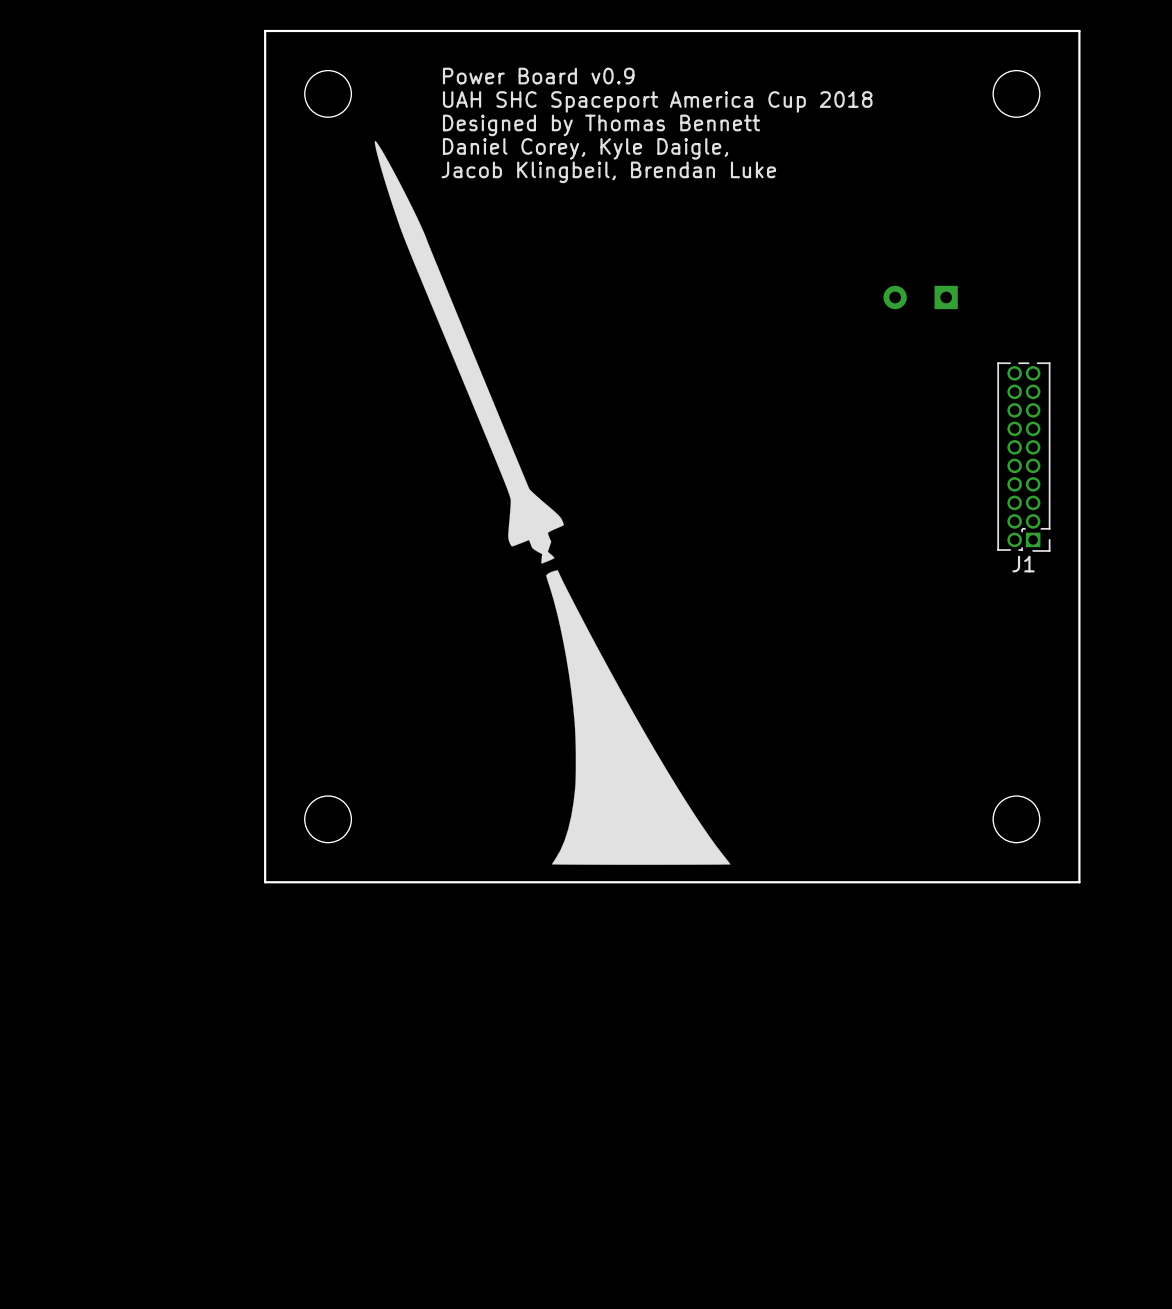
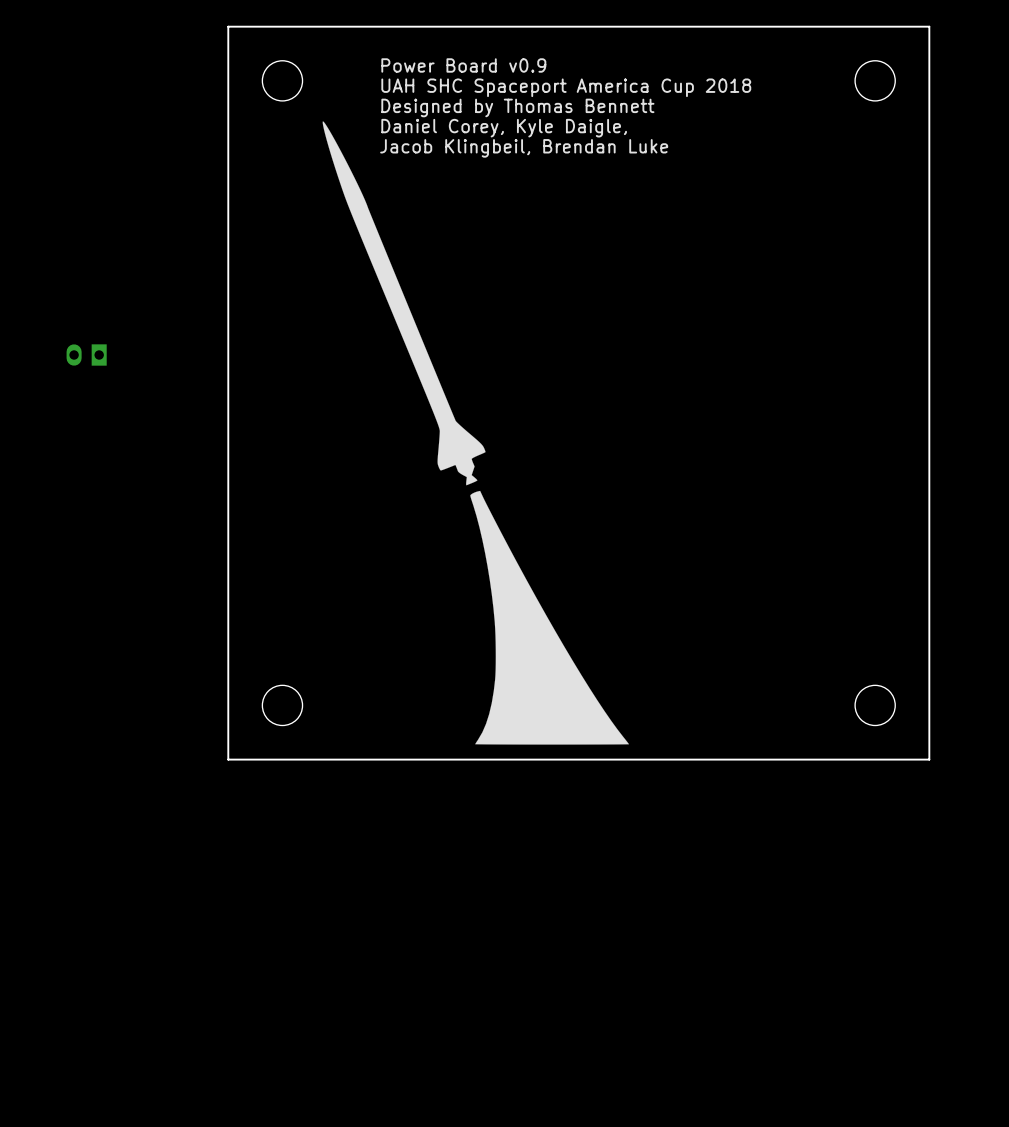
part: (920, 297) -> none
part: none -> (86, 355)
J1: (1023, 457) -> none

